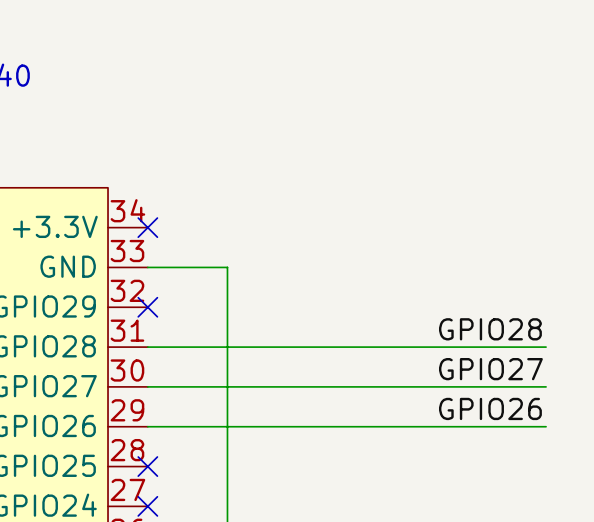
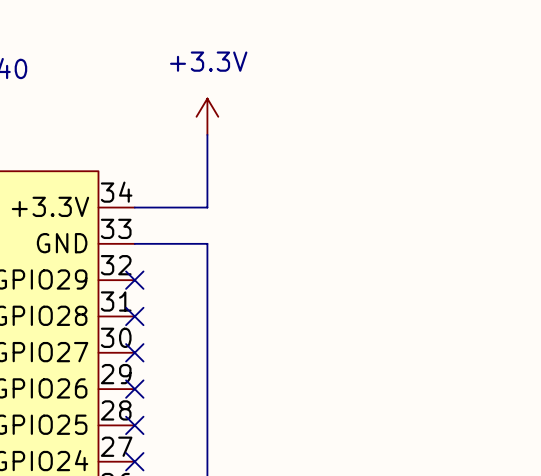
power symbol: none -> +3.3V (207, 116)
wire: none -> (207, 134) (207, 207) (134, 207)
no-connect mark: (147, 227) -> none
label: GPIO28 (490, 329) -> none
wire: (147, 347) (546, 347) -> none
no-connect mark: none -> (134, 316)
label: GPIO27 (490, 369) -> none
wire: (147, 386) (546, 386) -> none
no-connect mark: none -> (134, 352)
label: GPIO26 (490, 408) -> none
wire: (147, 426) (546, 426) -> none
no-connect mark: none -> (134, 389)

